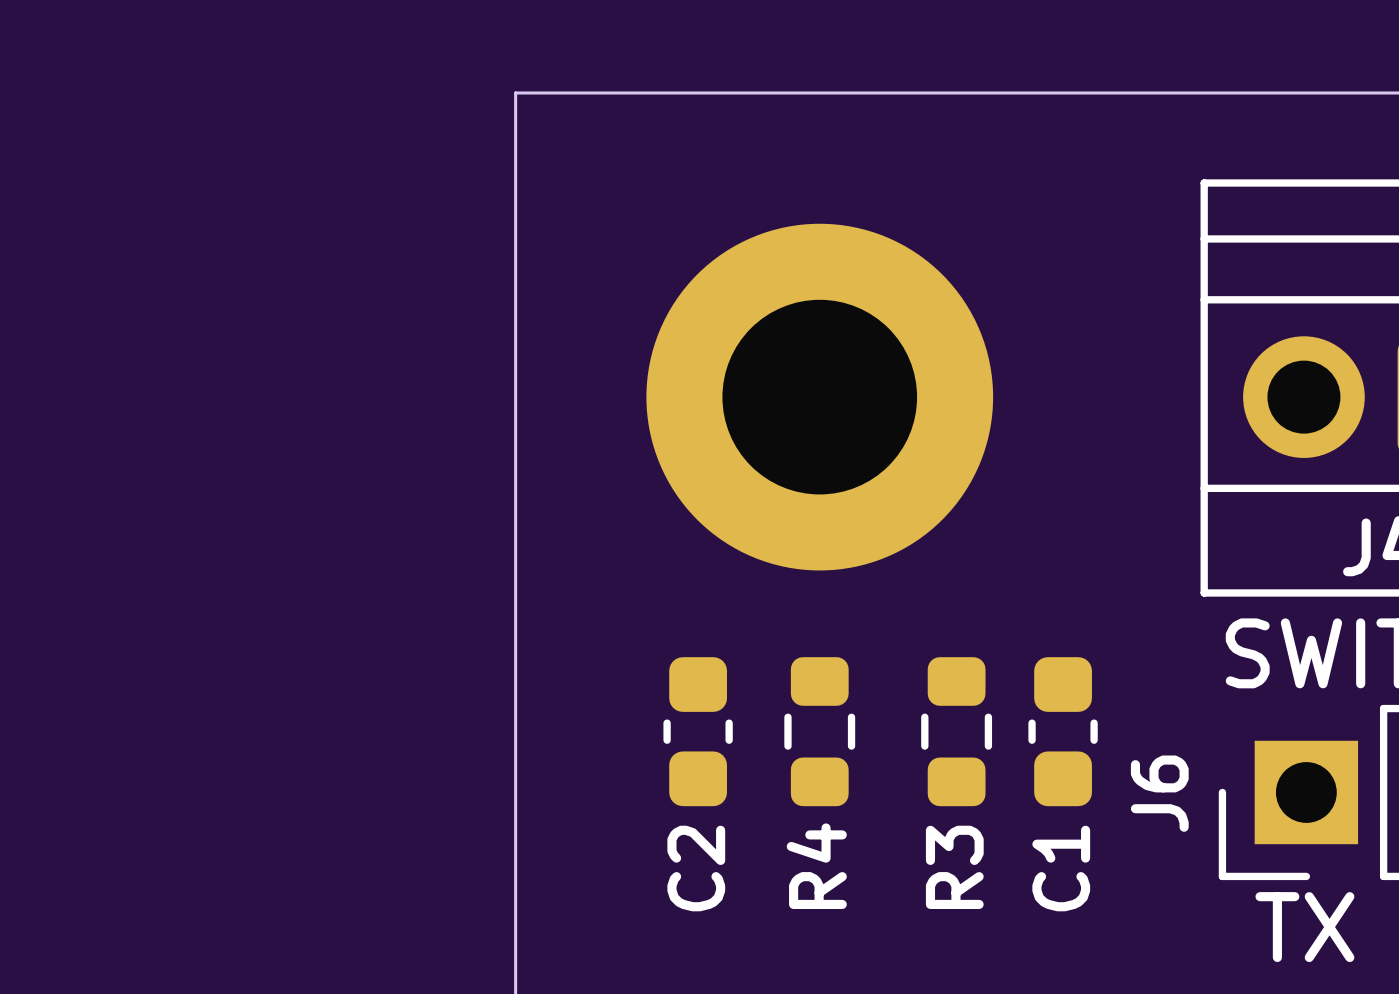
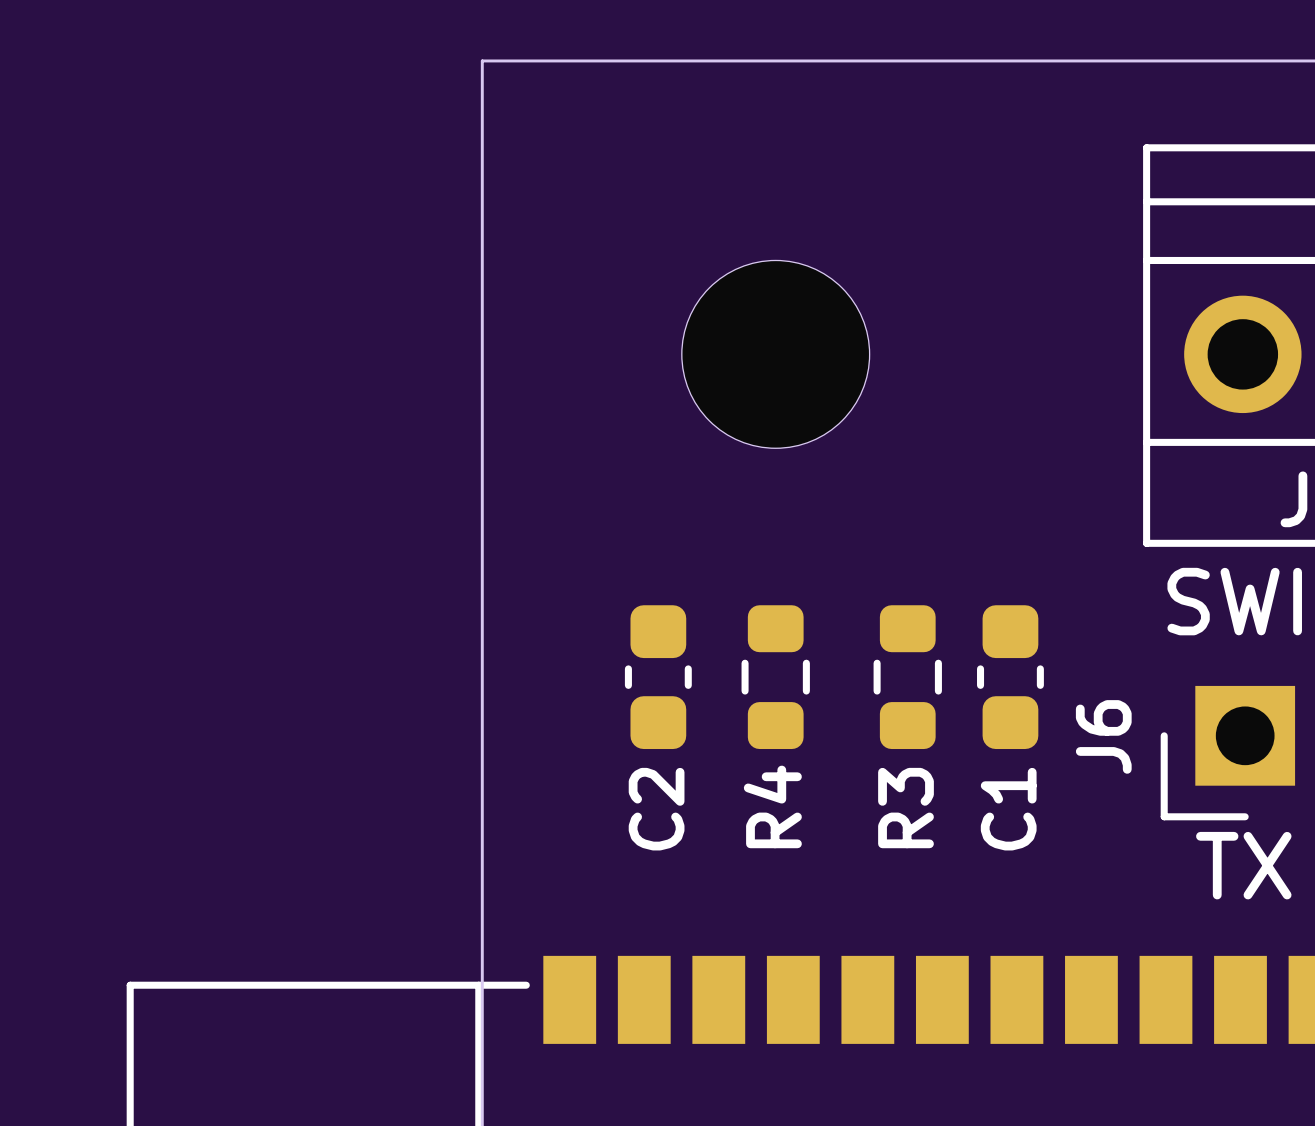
part footprint: [646, 223, 994, 571] -> [681, 260, 870, 449]

